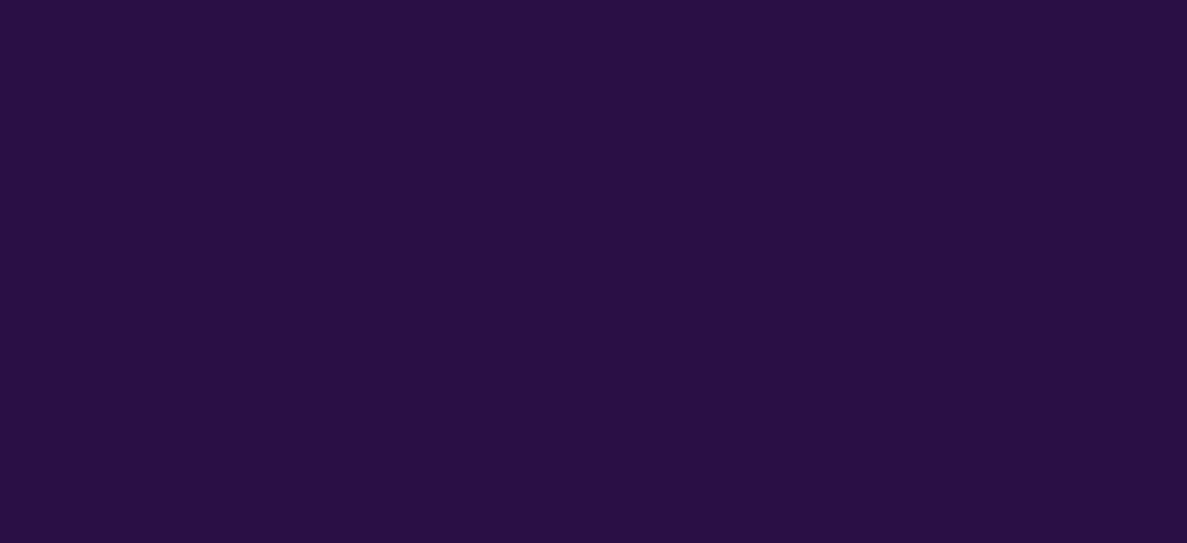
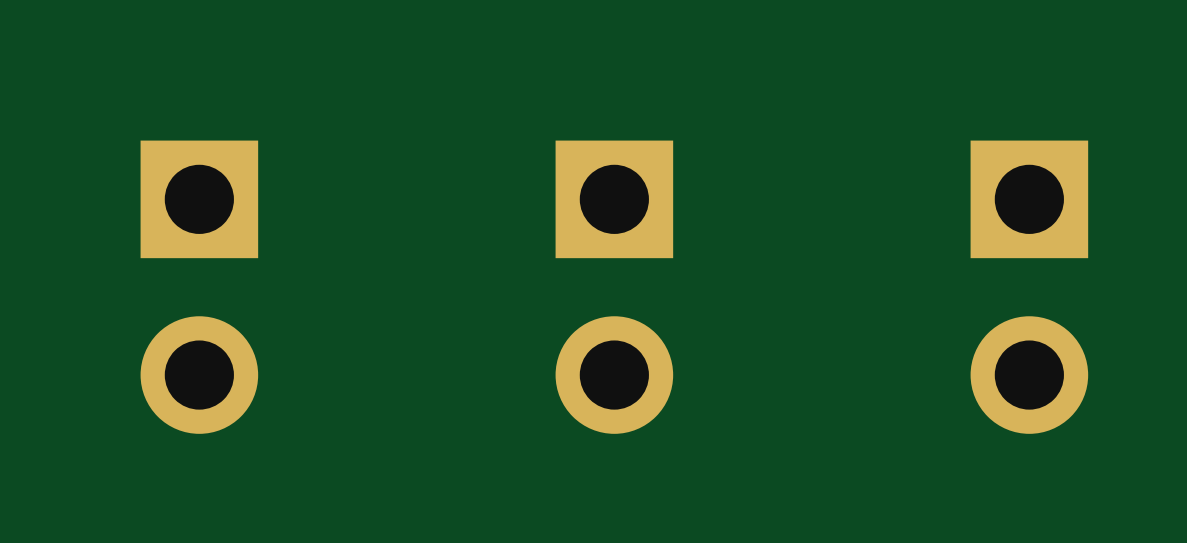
part: none -> (199, 287)
part: none -> (614, 287)
part: none -> (1029, 287)

